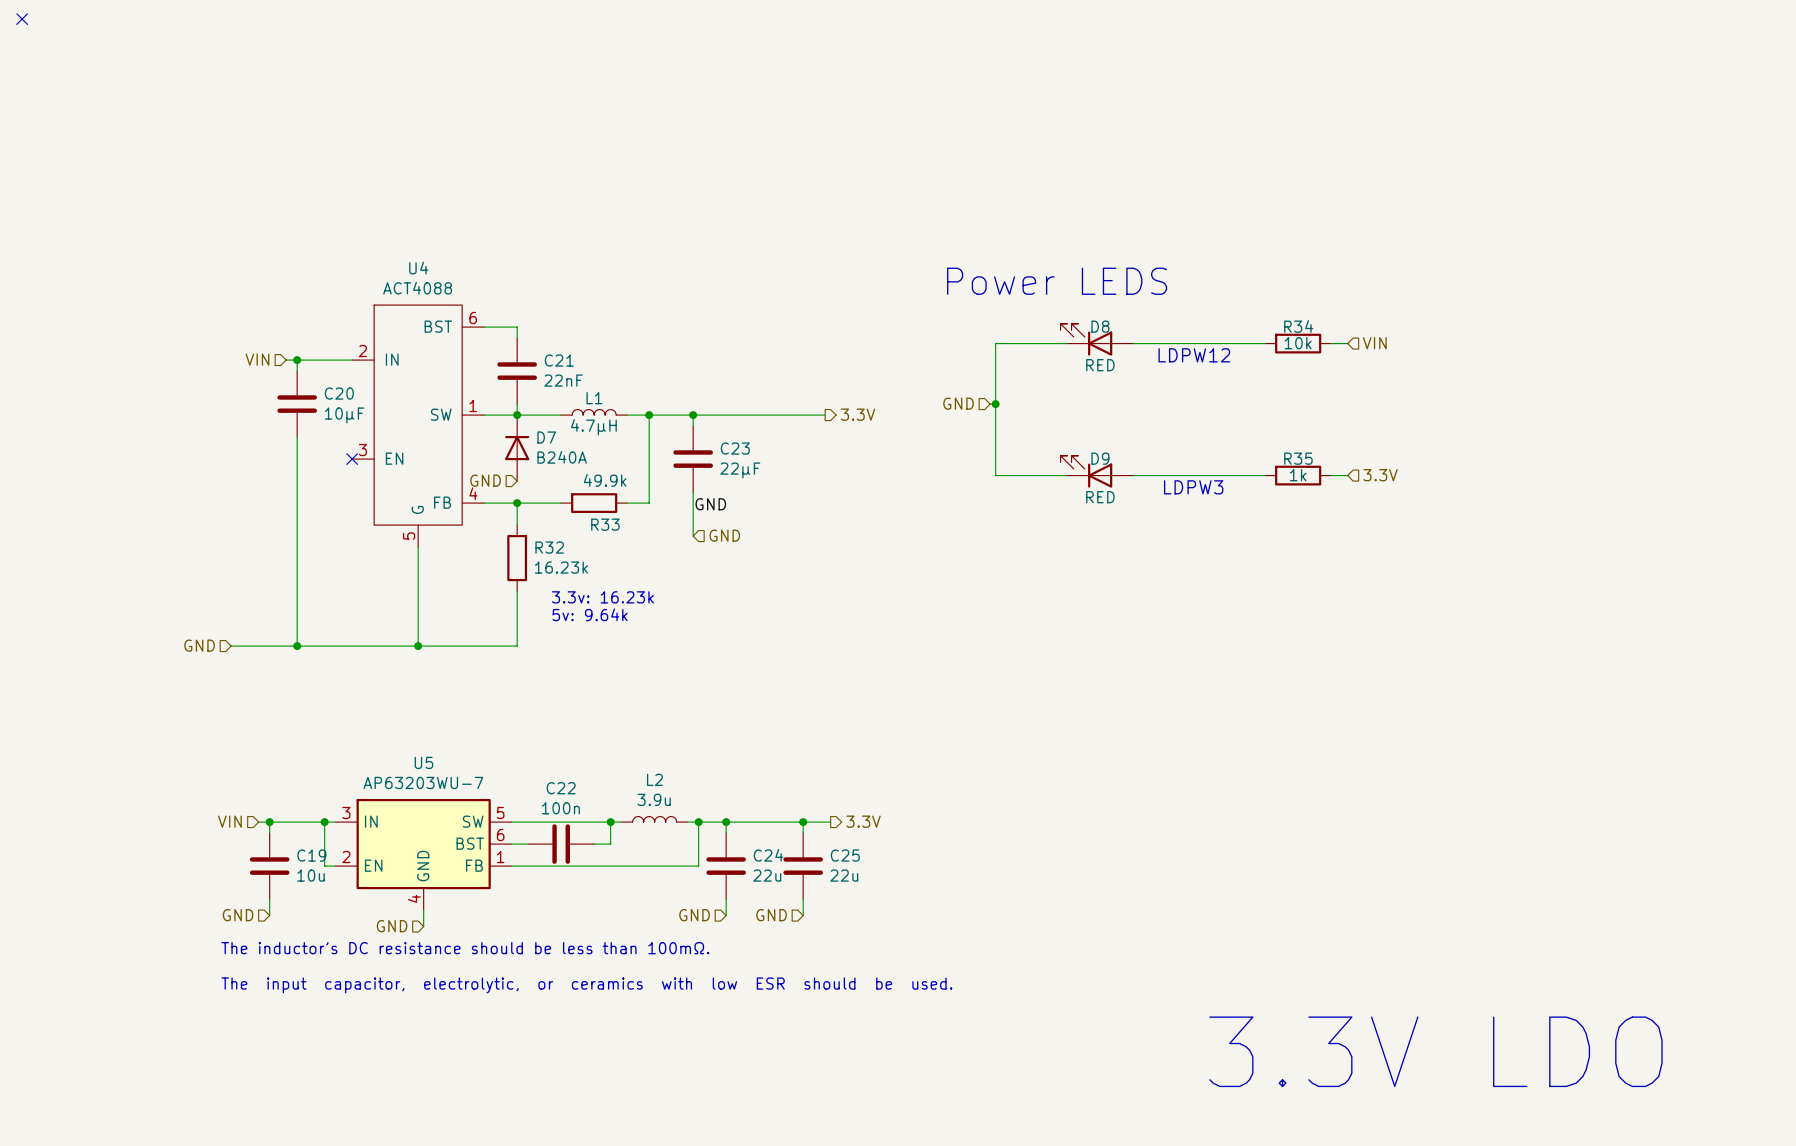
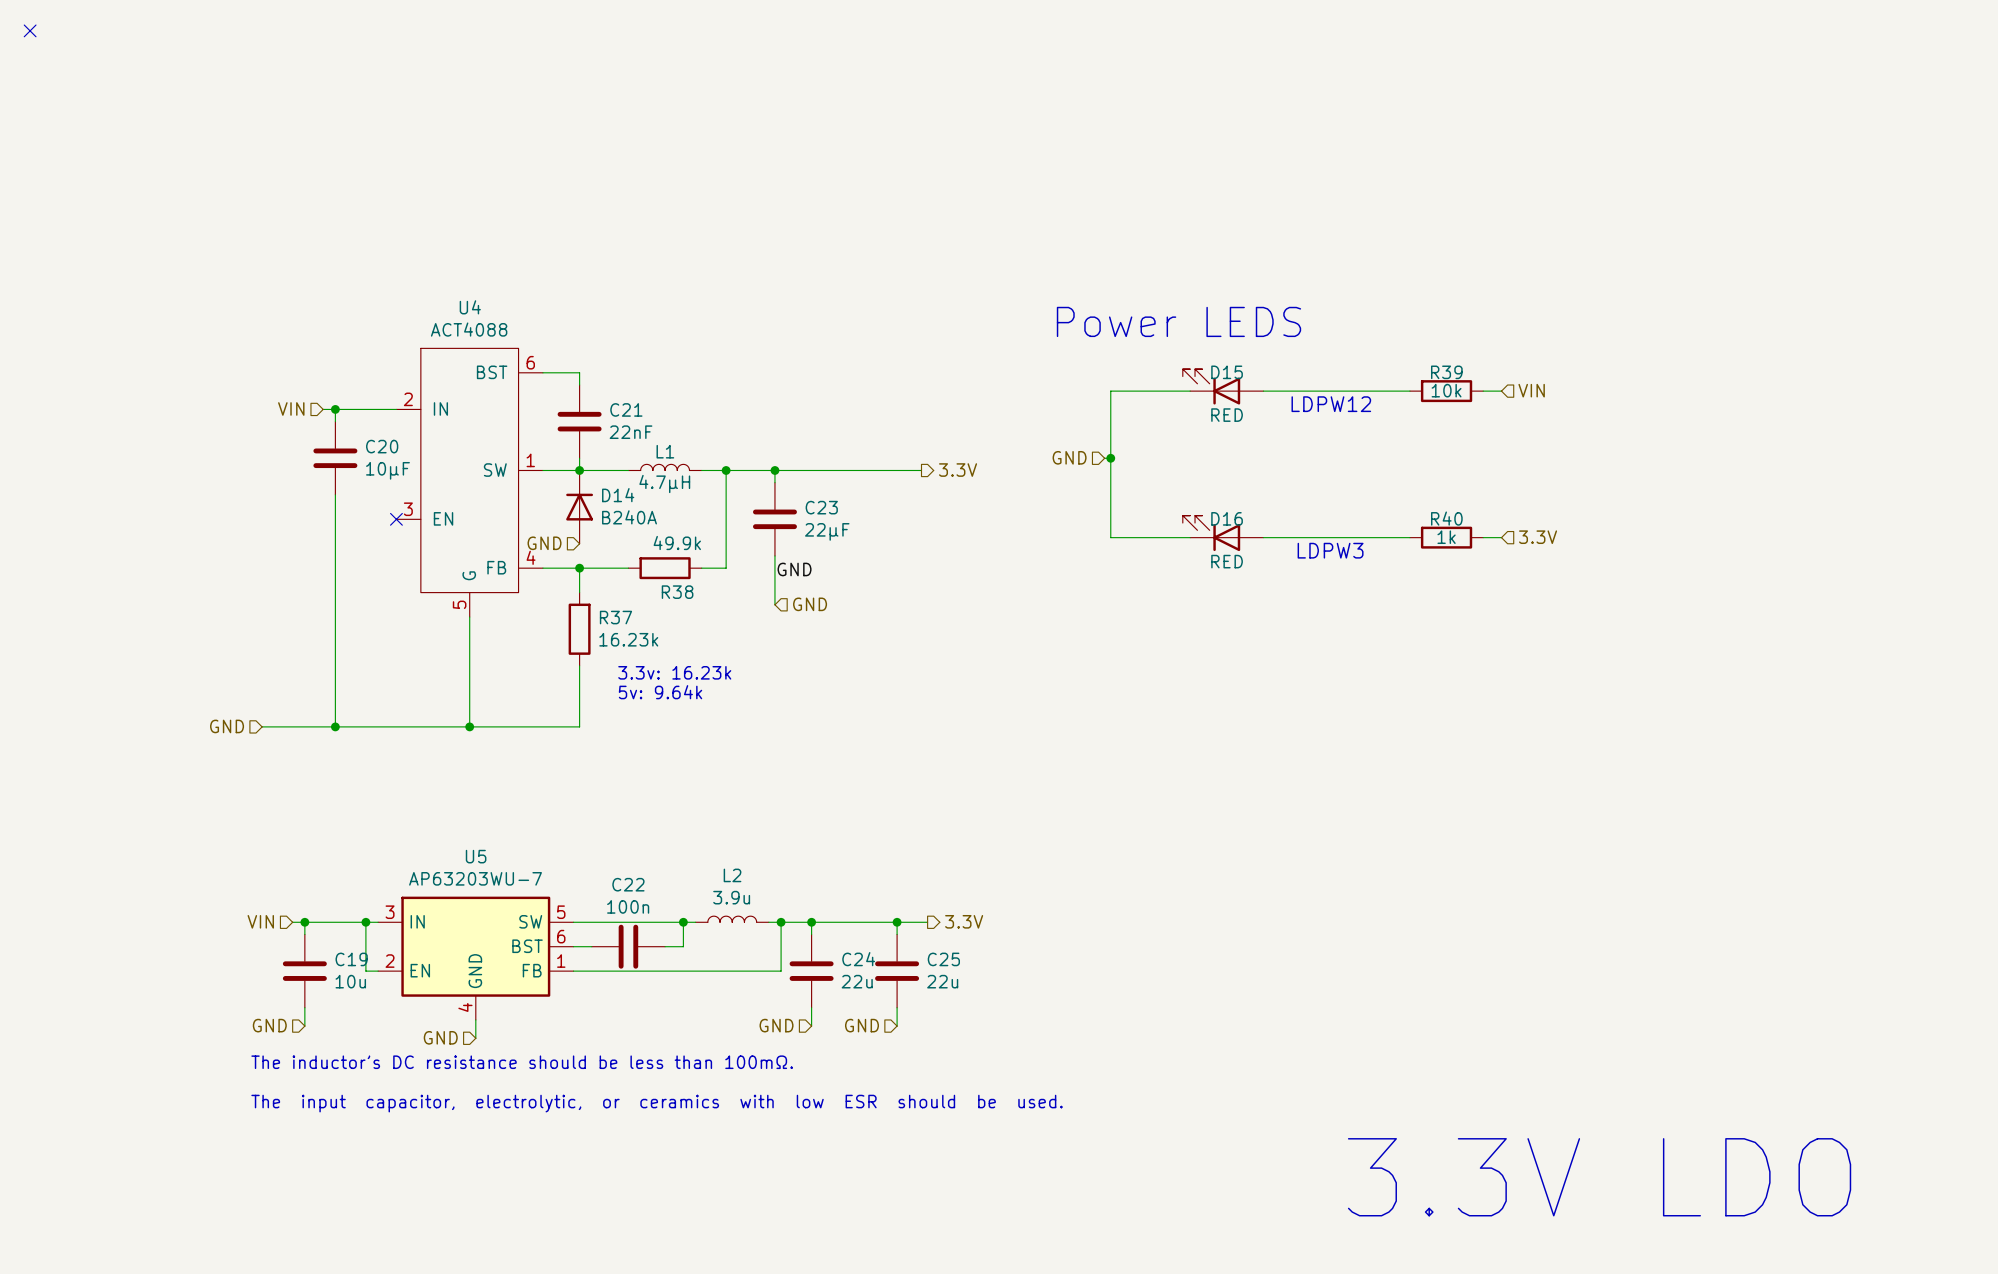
D8 name: D8 (1100, 326) -> D15 (1227, 372)
R34 name: R34 (1298, 326) -> R39 (1446, 372)
D7 name: D7 (546, 437) -> D14 (618, 495)
D9 name: D9 (1100, 458) -> D16 (1227, 518)
R35 name: R35 (1298, 458) -> R40 (1446, 518)
R33 name: R33 (605, 524) -> R38 (677, 592)
R32 name: R32 (549, 547) -> R37 (615, 617)

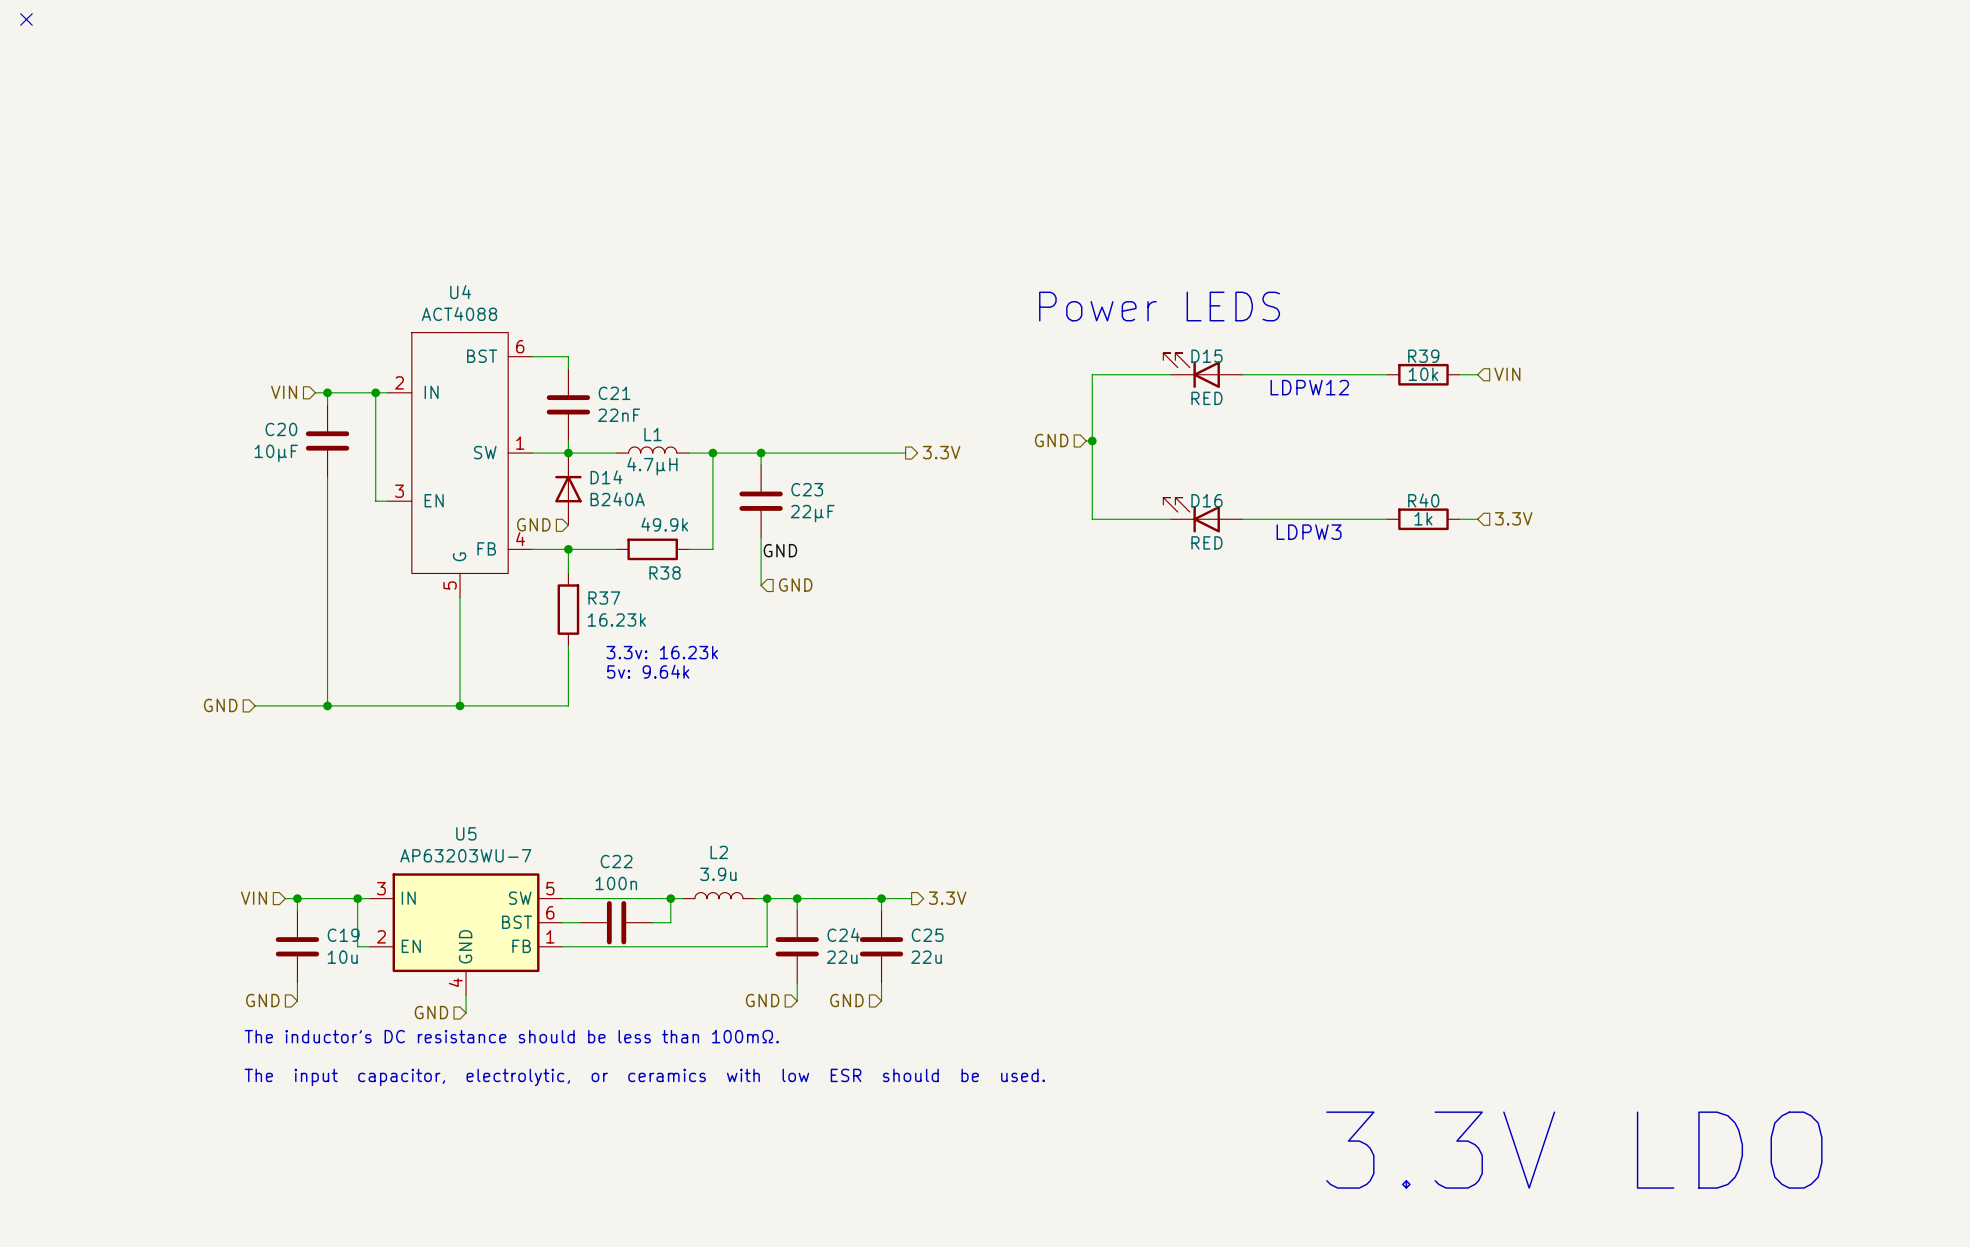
wire: none -> (375, 392) (375, 501) (387, 501)
junction: none -> (375, 392)
C20 name position: C20 (382, 446) -> C20 (281, 429)
C20 value position: 10µF (387, 470) -> 10µF (276, 453)
no-connect mark: (396, 519) -> none

